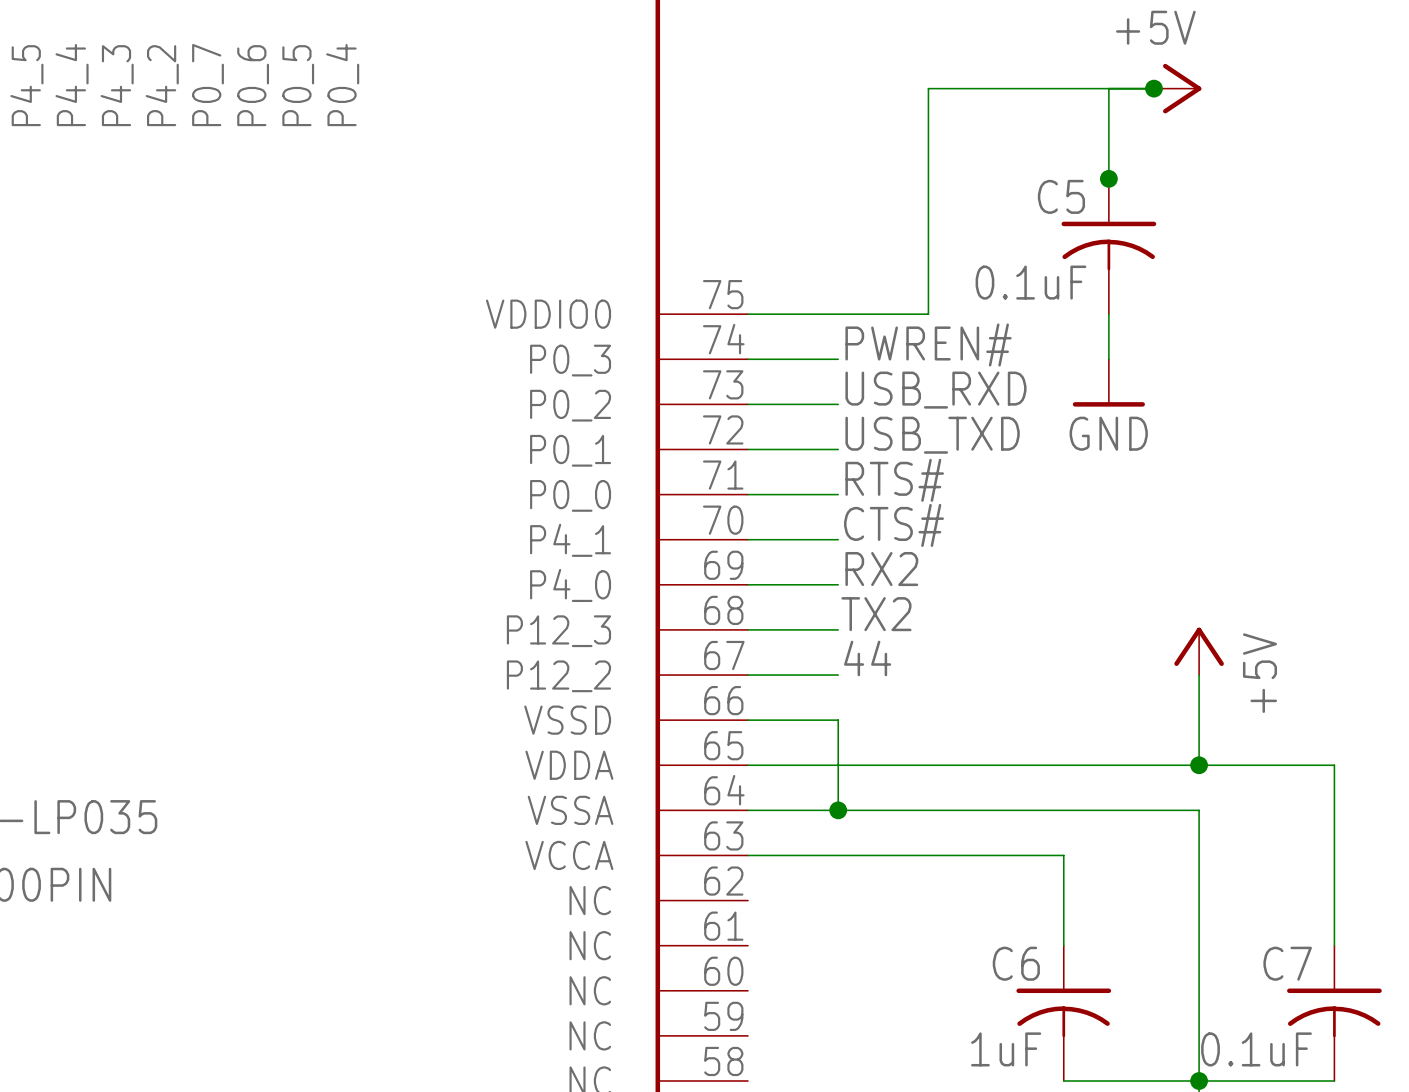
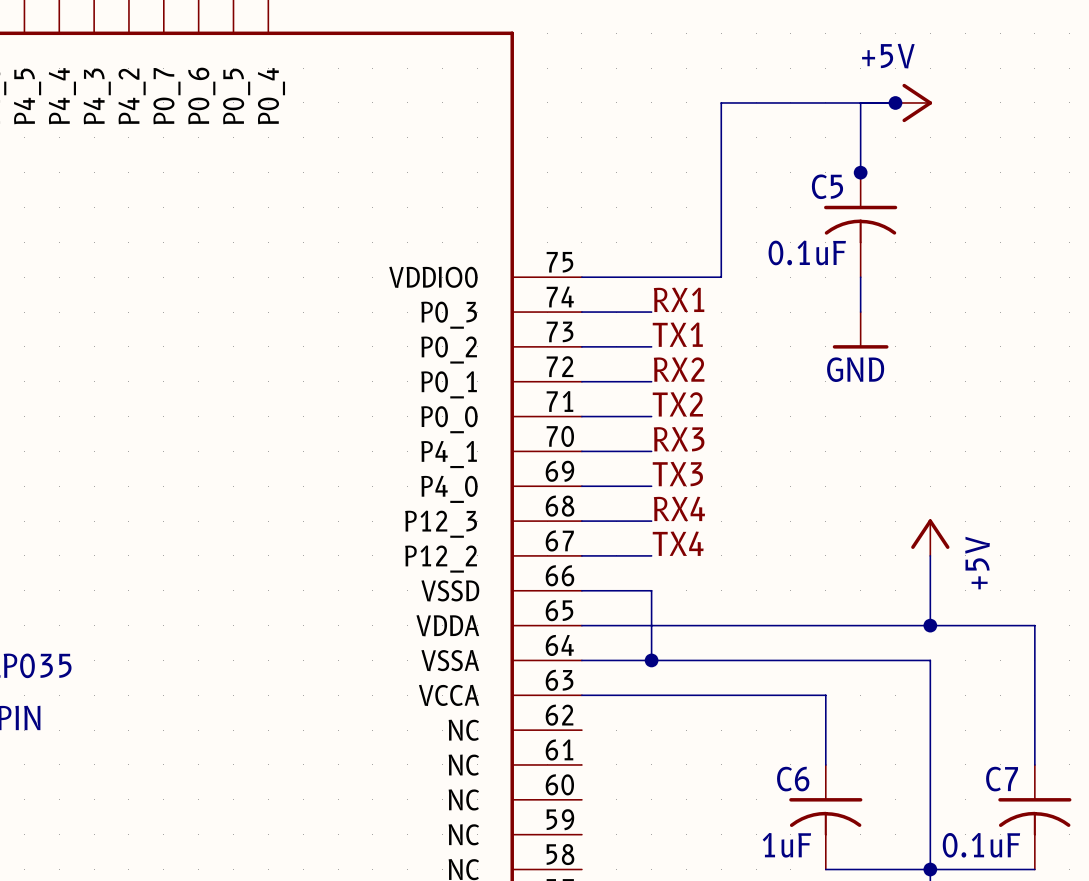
label: PWREN# (928, 344) -> RX1 (679, 299)
label: USB_RXD (935, 390) -> TX1 (677, 334)
label: USB_TXD (932, 435) -> RX2 (679, 369)
label: RTS# (894, 480) -> TX2 (677, 404)
label: CTS# (894, 525) -> RX3 (679, 439)
label: RX2 (881, 569) -> TX3 (677, 474)
label: TX2 (876, 614) -> RX4 (679, 508)
label: 44 (867, 658) -> TX4 (678, 543)

